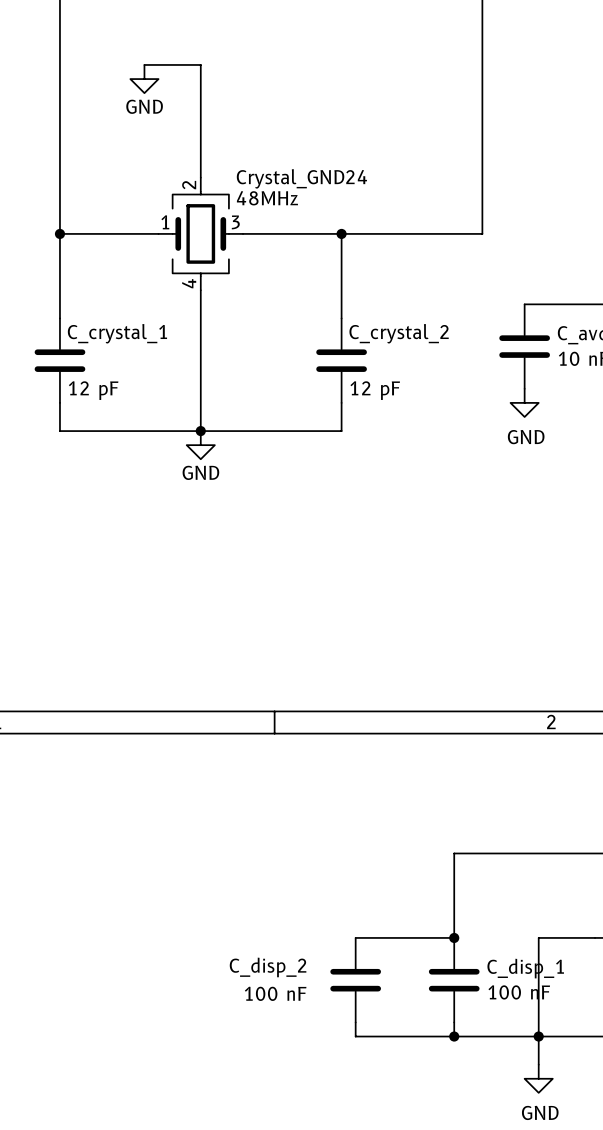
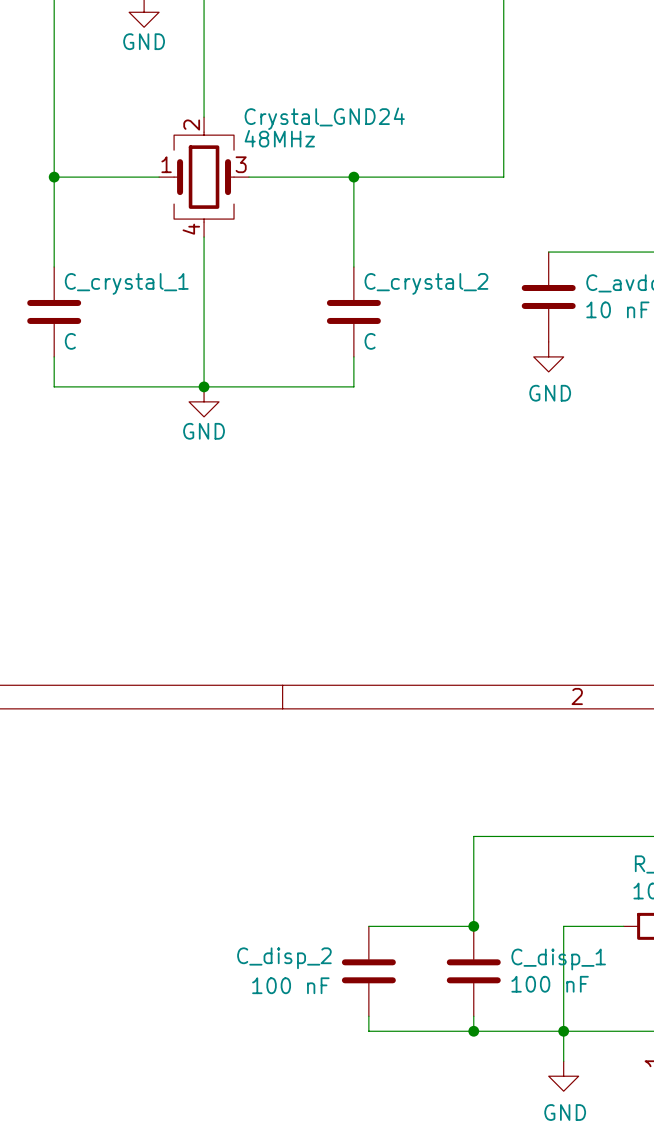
C_crystal_1 value: 12 pF (93, 390) -> C (70, 341)
C_crystal_2 value: 12 pF (375, 390) -> C (370, 341)

